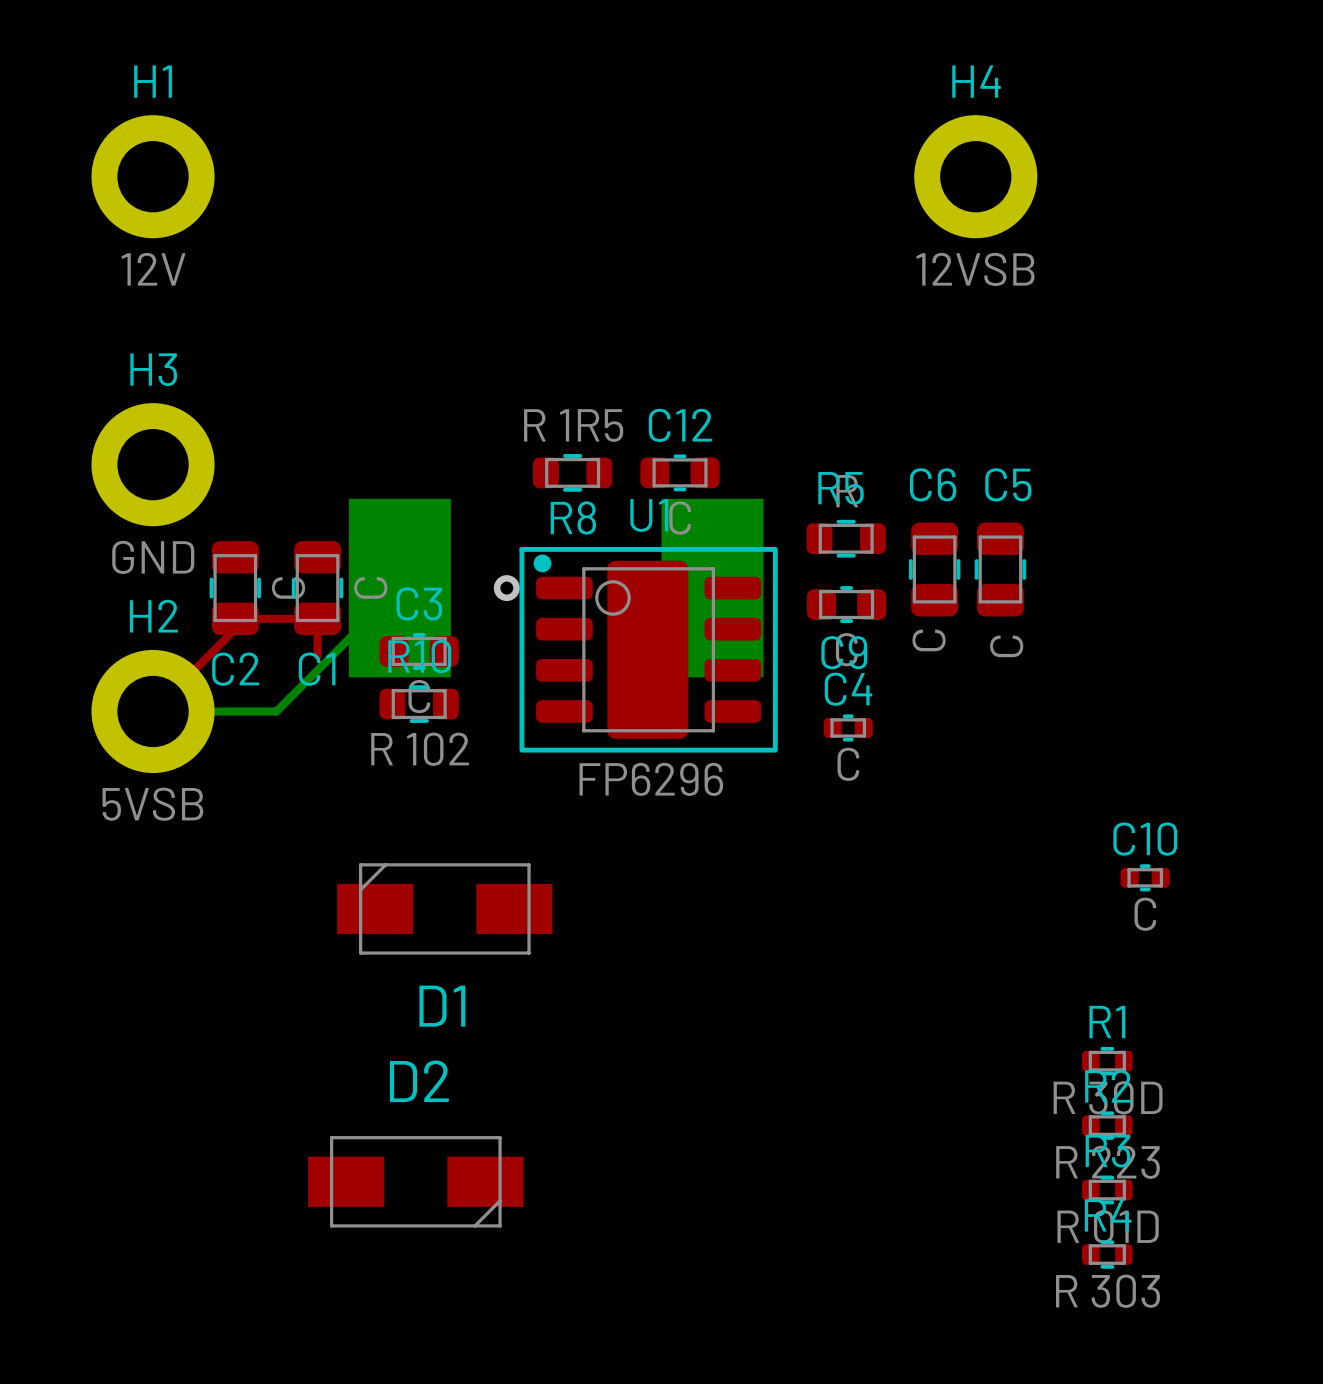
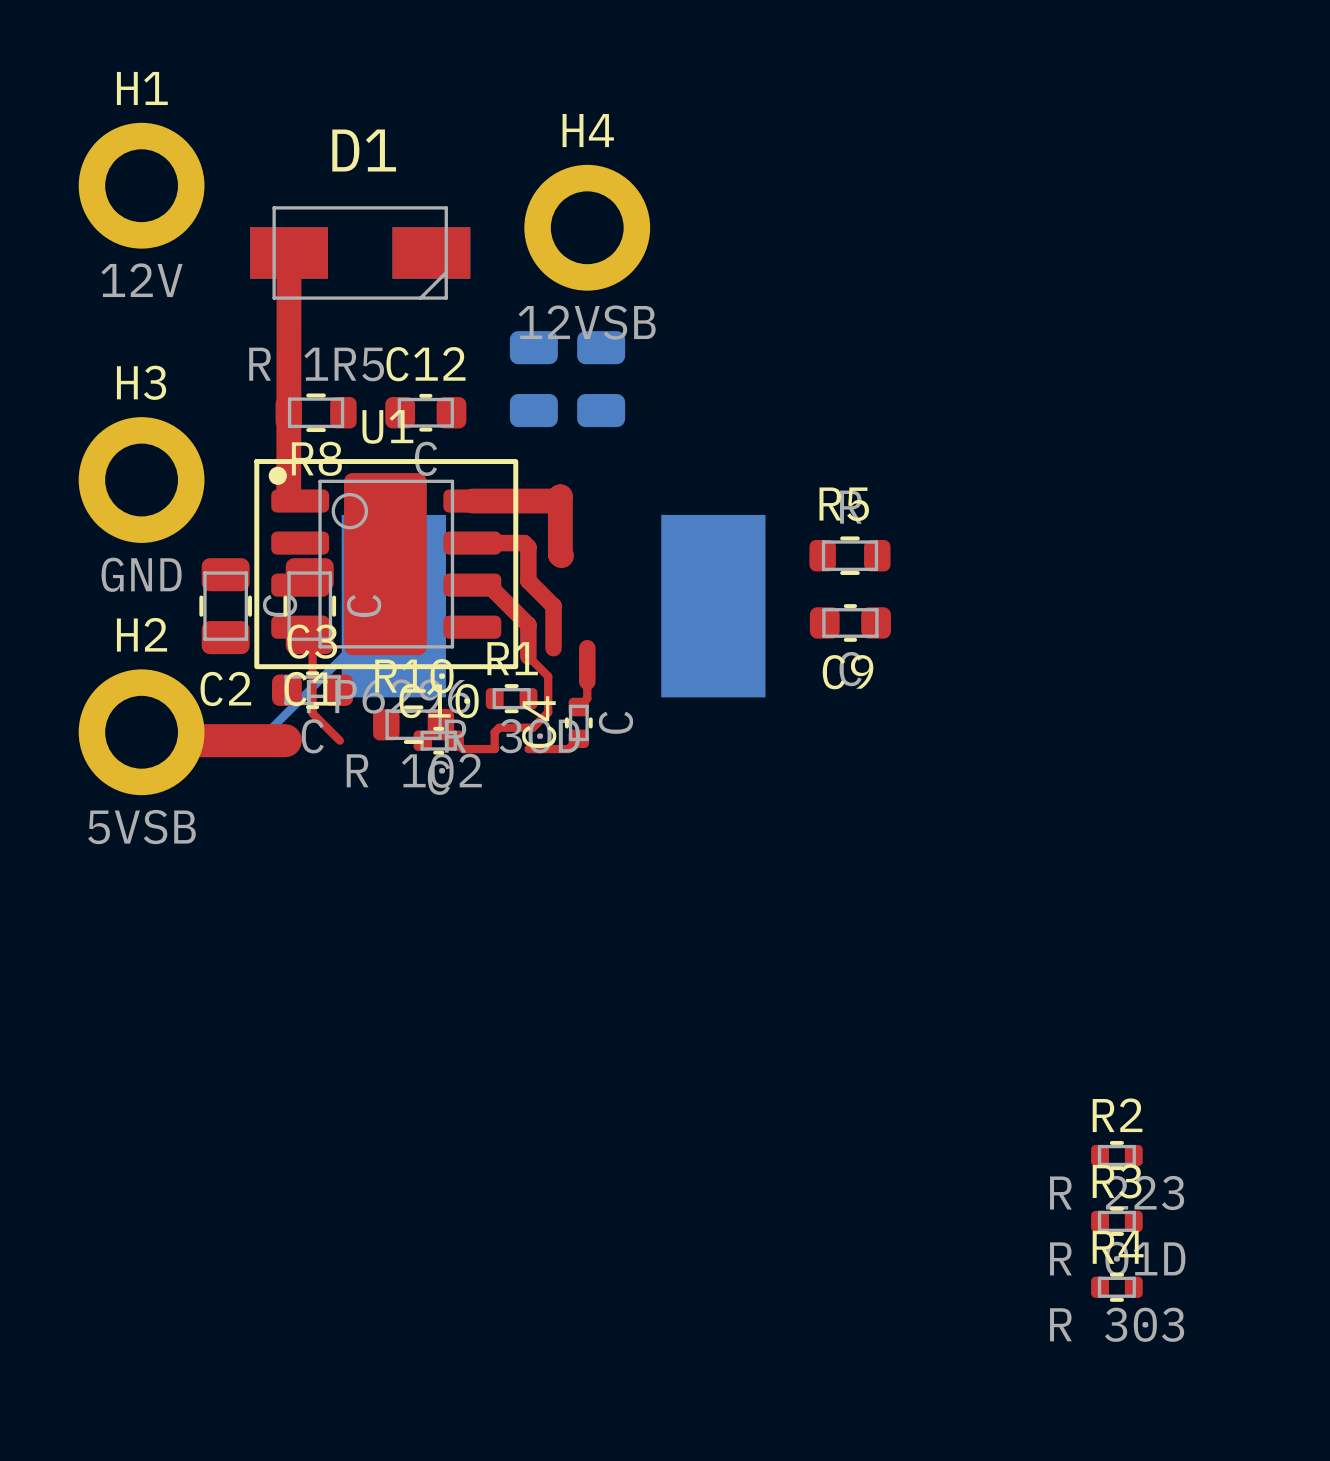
H4 position: (975, 176) -> (587, 227)
top track: none -> (289, 252) (288, 489)
R8 position: (572, 472) -> (316, 412)
C12 position: (680, 472) -> (425, 412)
top track: none -> (472, 501) (556, 501) (560, 496) (561, 555)
top track: none -> (472, 543) (524, 543) (528, 547) (528, 580) (553, 606) (553, 648)
top track: none -> (472, 585) (488, 585) (528, 624) (528, 656) (548, 676) (548, 712) (532, 727) (499, 727) (494, 732) (494, 749) (463, 749) (454, 740)
C6 side: top (934, 569) -> bottom (601, 379)
C5 side: top (1000, 569) -> bottom (533, 379)
via: (506, 588) -> none
top track: none -> (300, 627) (312, 639) (312, 713) (339, 740)
top track: none -> (587, 648) (587, 698) (578, 707)
U1 position: (648, 649) -> (386, 564)
C3 position: (419, 651) -> (312, 690)
top track: (317, 655) (317, 618) (235, 618) (235, 629) (153, 711) -> (276, 732) (285, 740) (149, 740) (141, 732)
top track: none -> (578, 738) (568, 749) (528, 749)
C4 rotation: 0° (848, 727) -> 90° clockwise (578, 722)
C4 position: (848, 727) -> (578, 722)
C10 position: (1145, 877) -> (438, 740)
D1 rotation: 0° (444, 908) -> 180° (360, 252)
D1 position: (444, 908) -> (360, 252)
R1 position: (1107, 1061) -> (511, 698)
D2: (415, 1181) -> none

